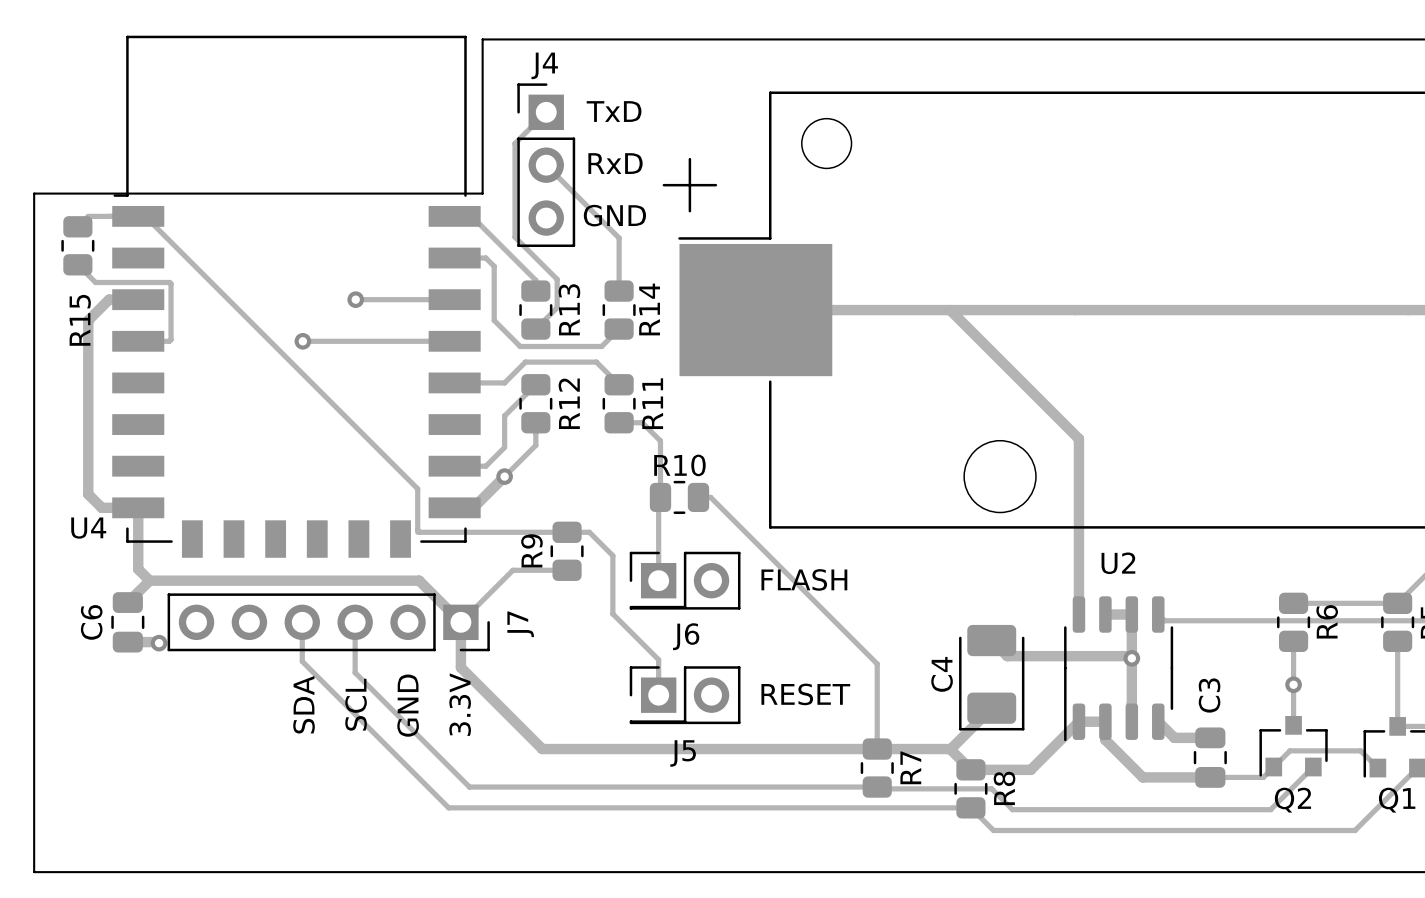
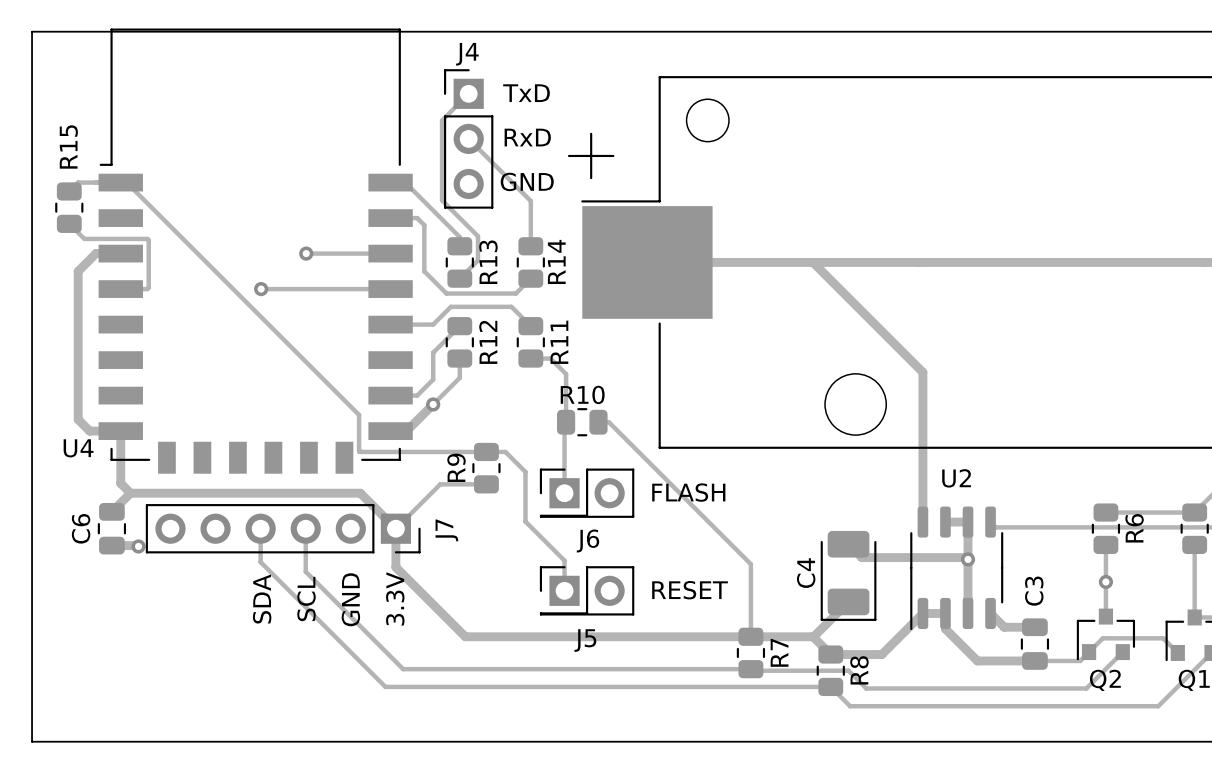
board edge: (482, 39) (482, 193) (34, 193) -> (414, 31) (32, 31) (32, 163)
R15 name position: R15 (80, 320) -> R15 (68, 146)

